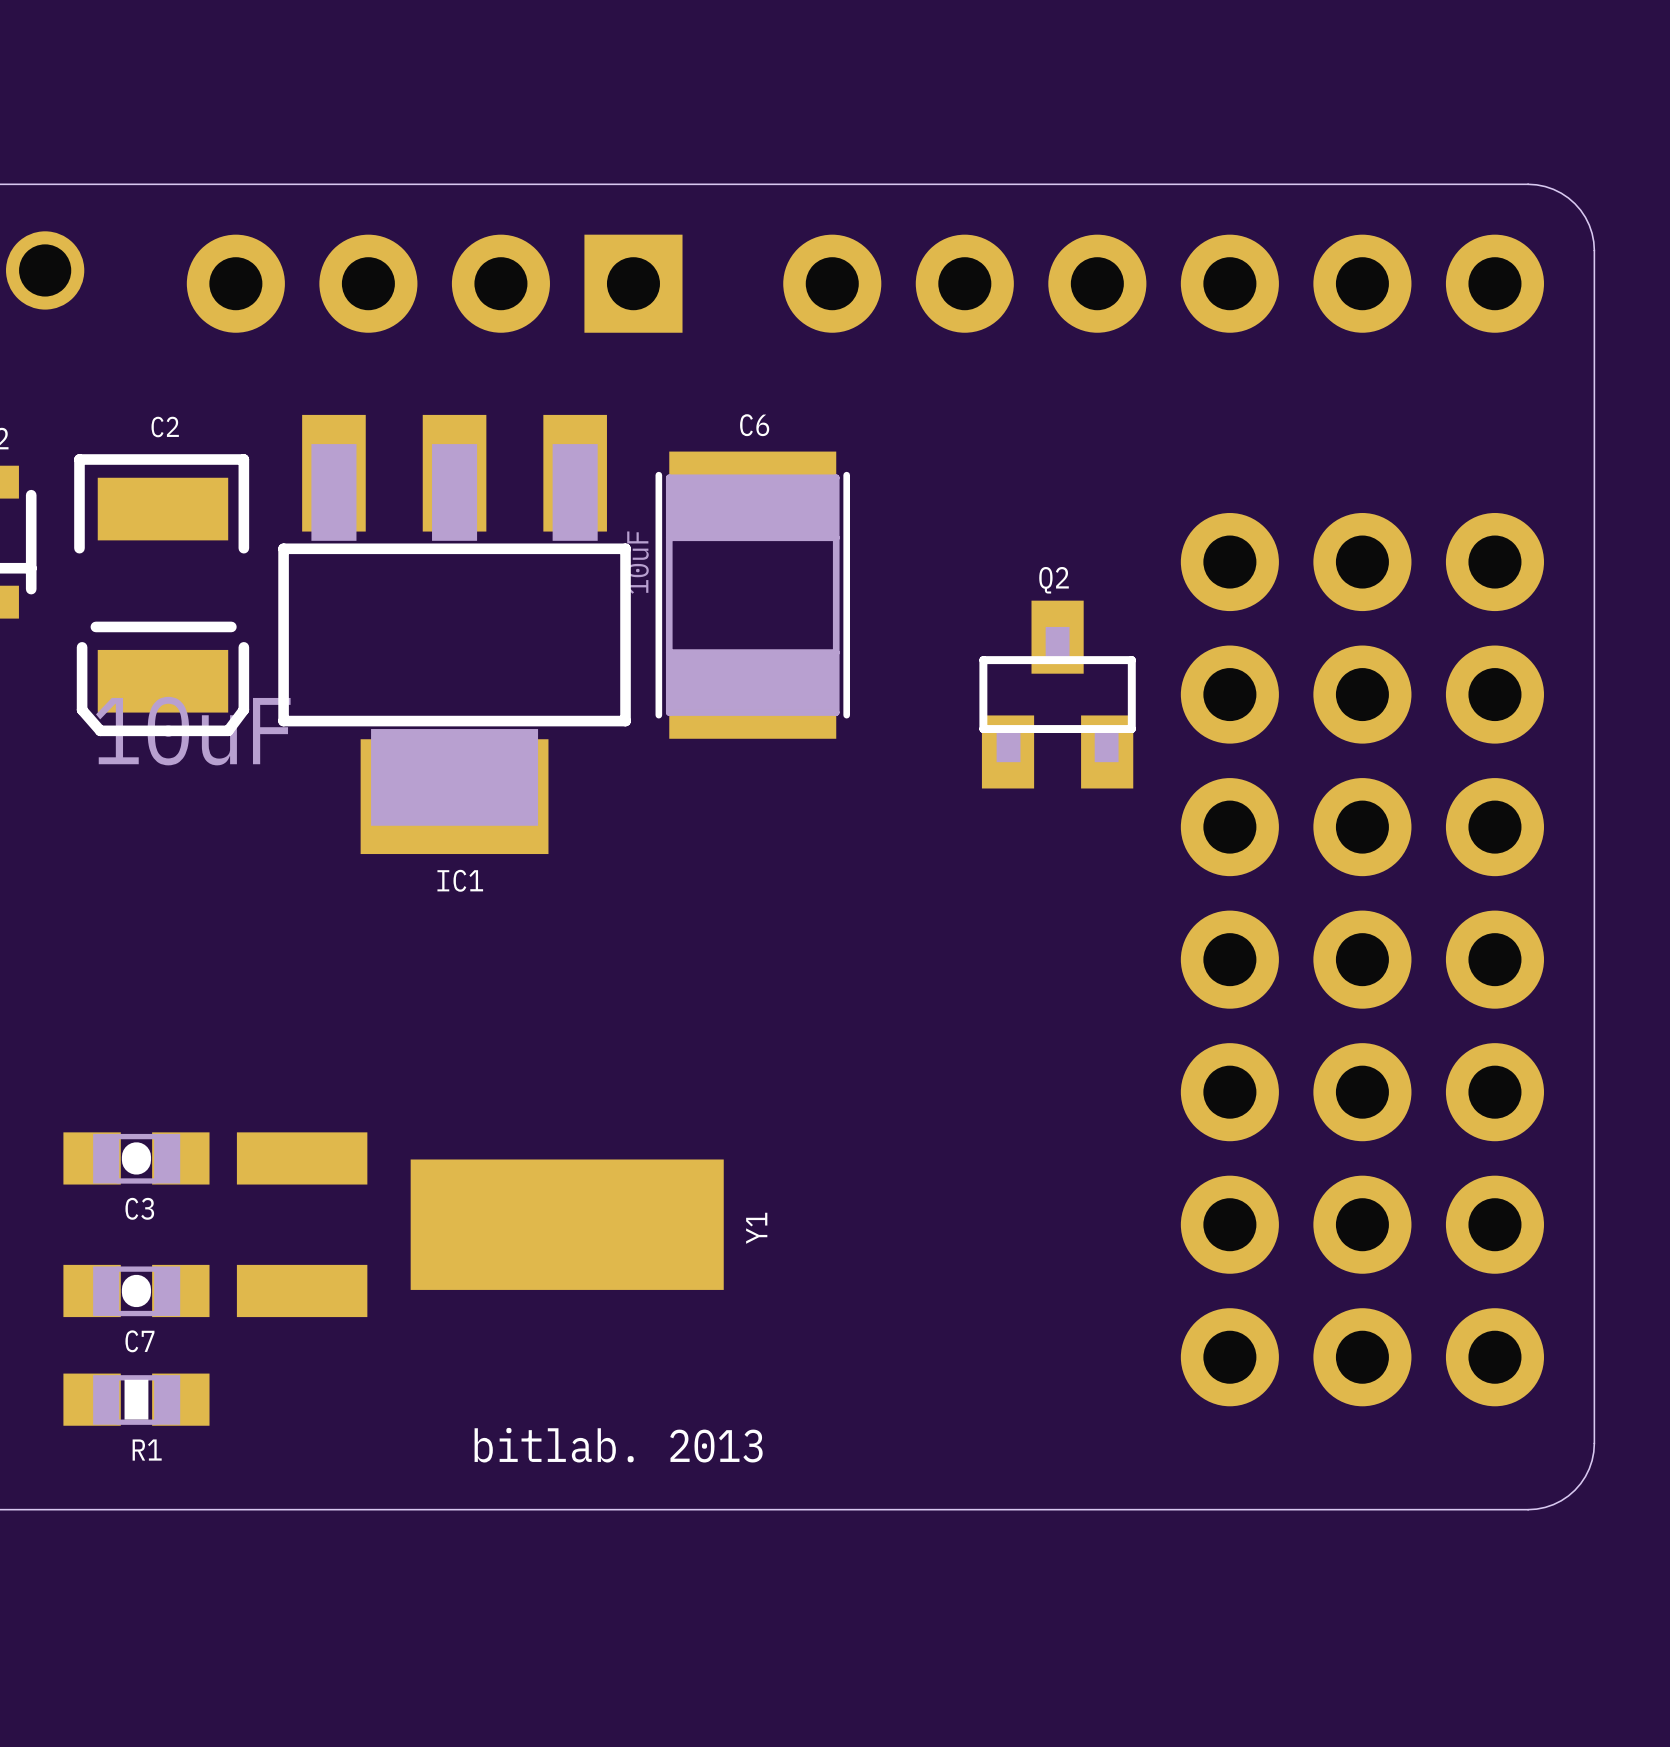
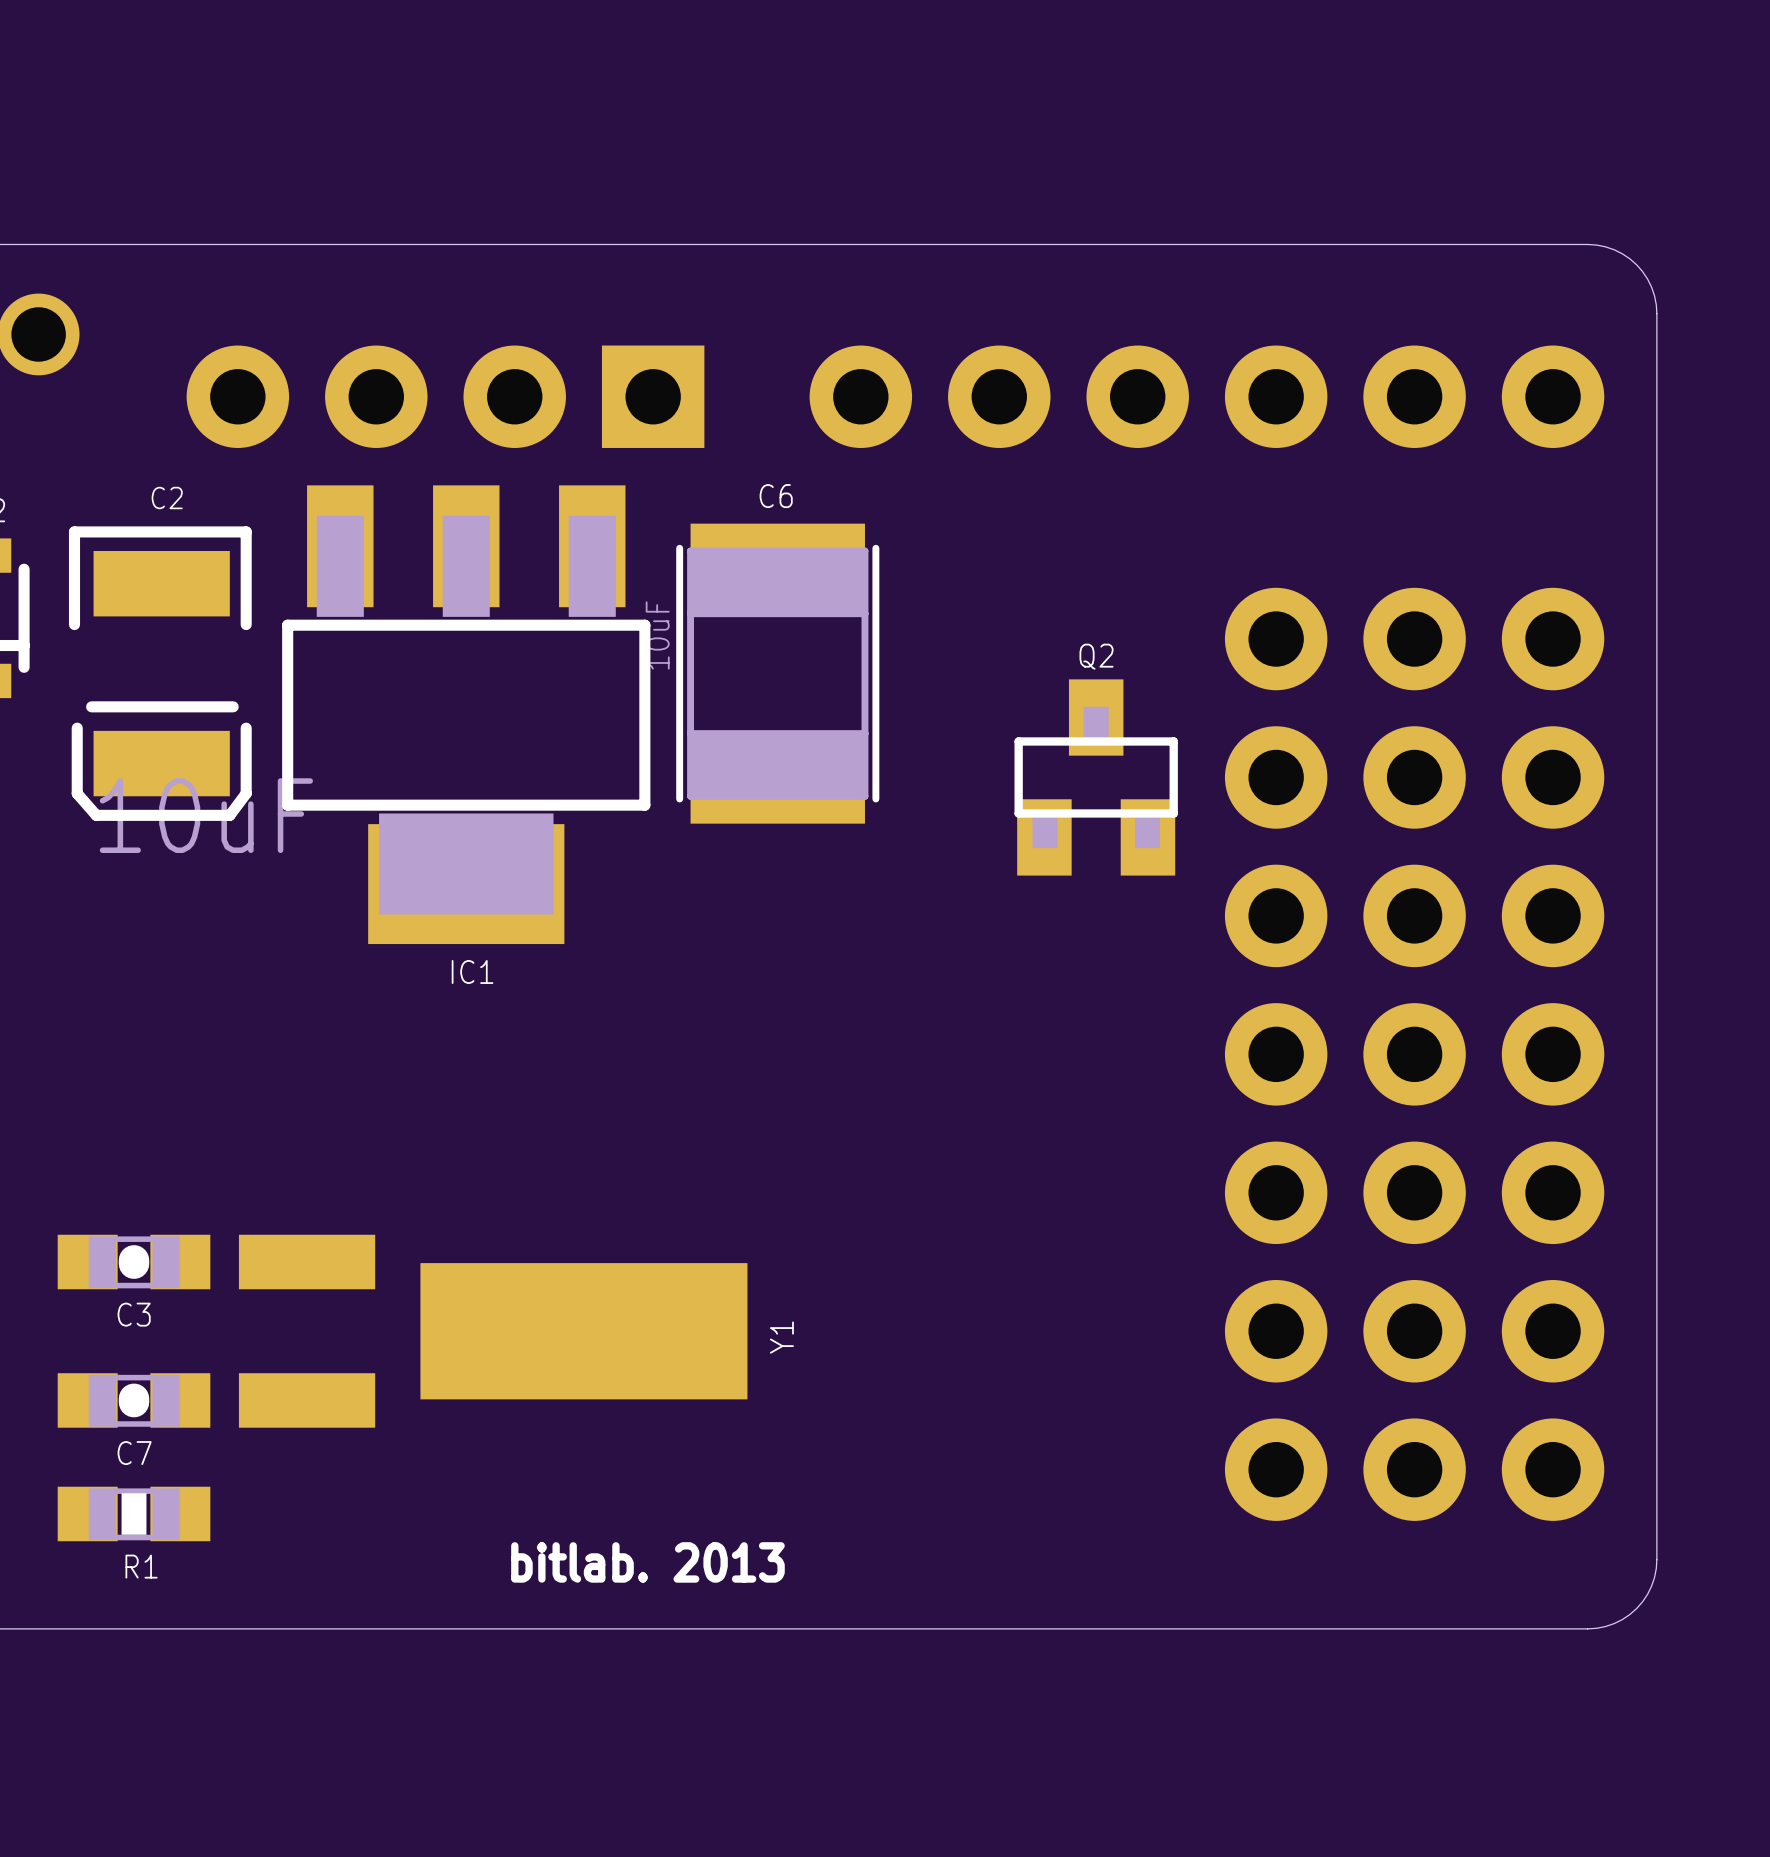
part position: (434, 283) -> (445, 396)
part position: (1163, 283) -> (1206, 396)

